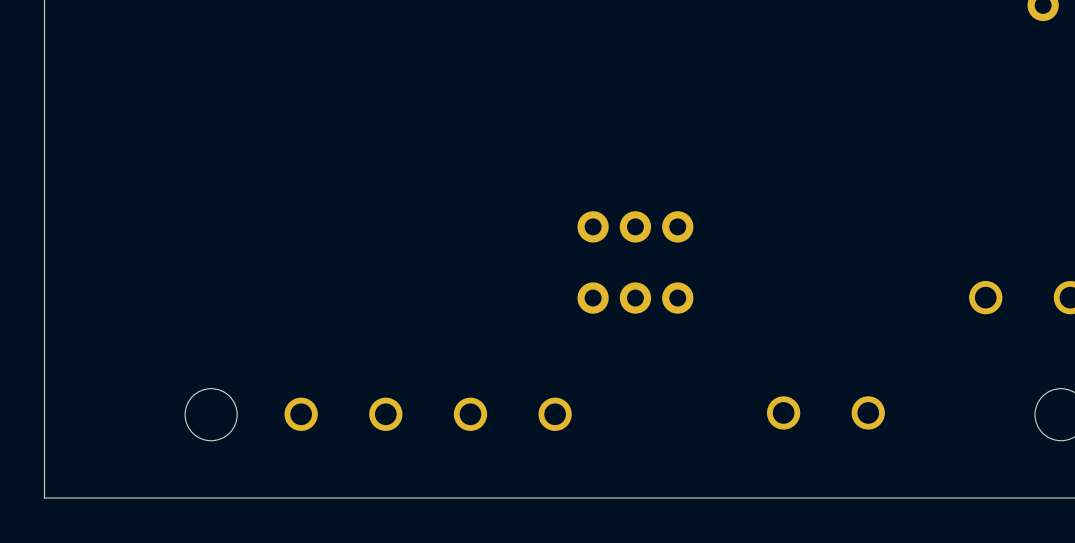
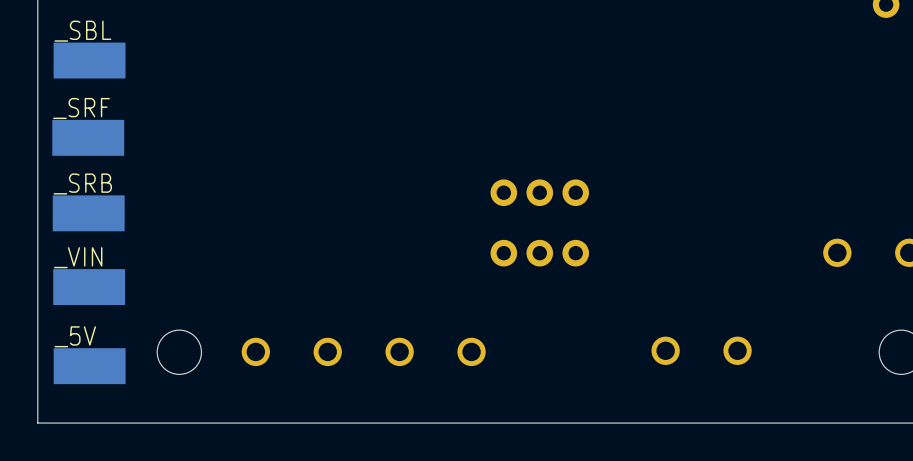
_SBL: none -> (89, 60)
_SRF: none -> (88, 137)
_SRB: none -> (88, 213)
_VIN: none -> (89, 287)
_5V: none -> (89, 366)

